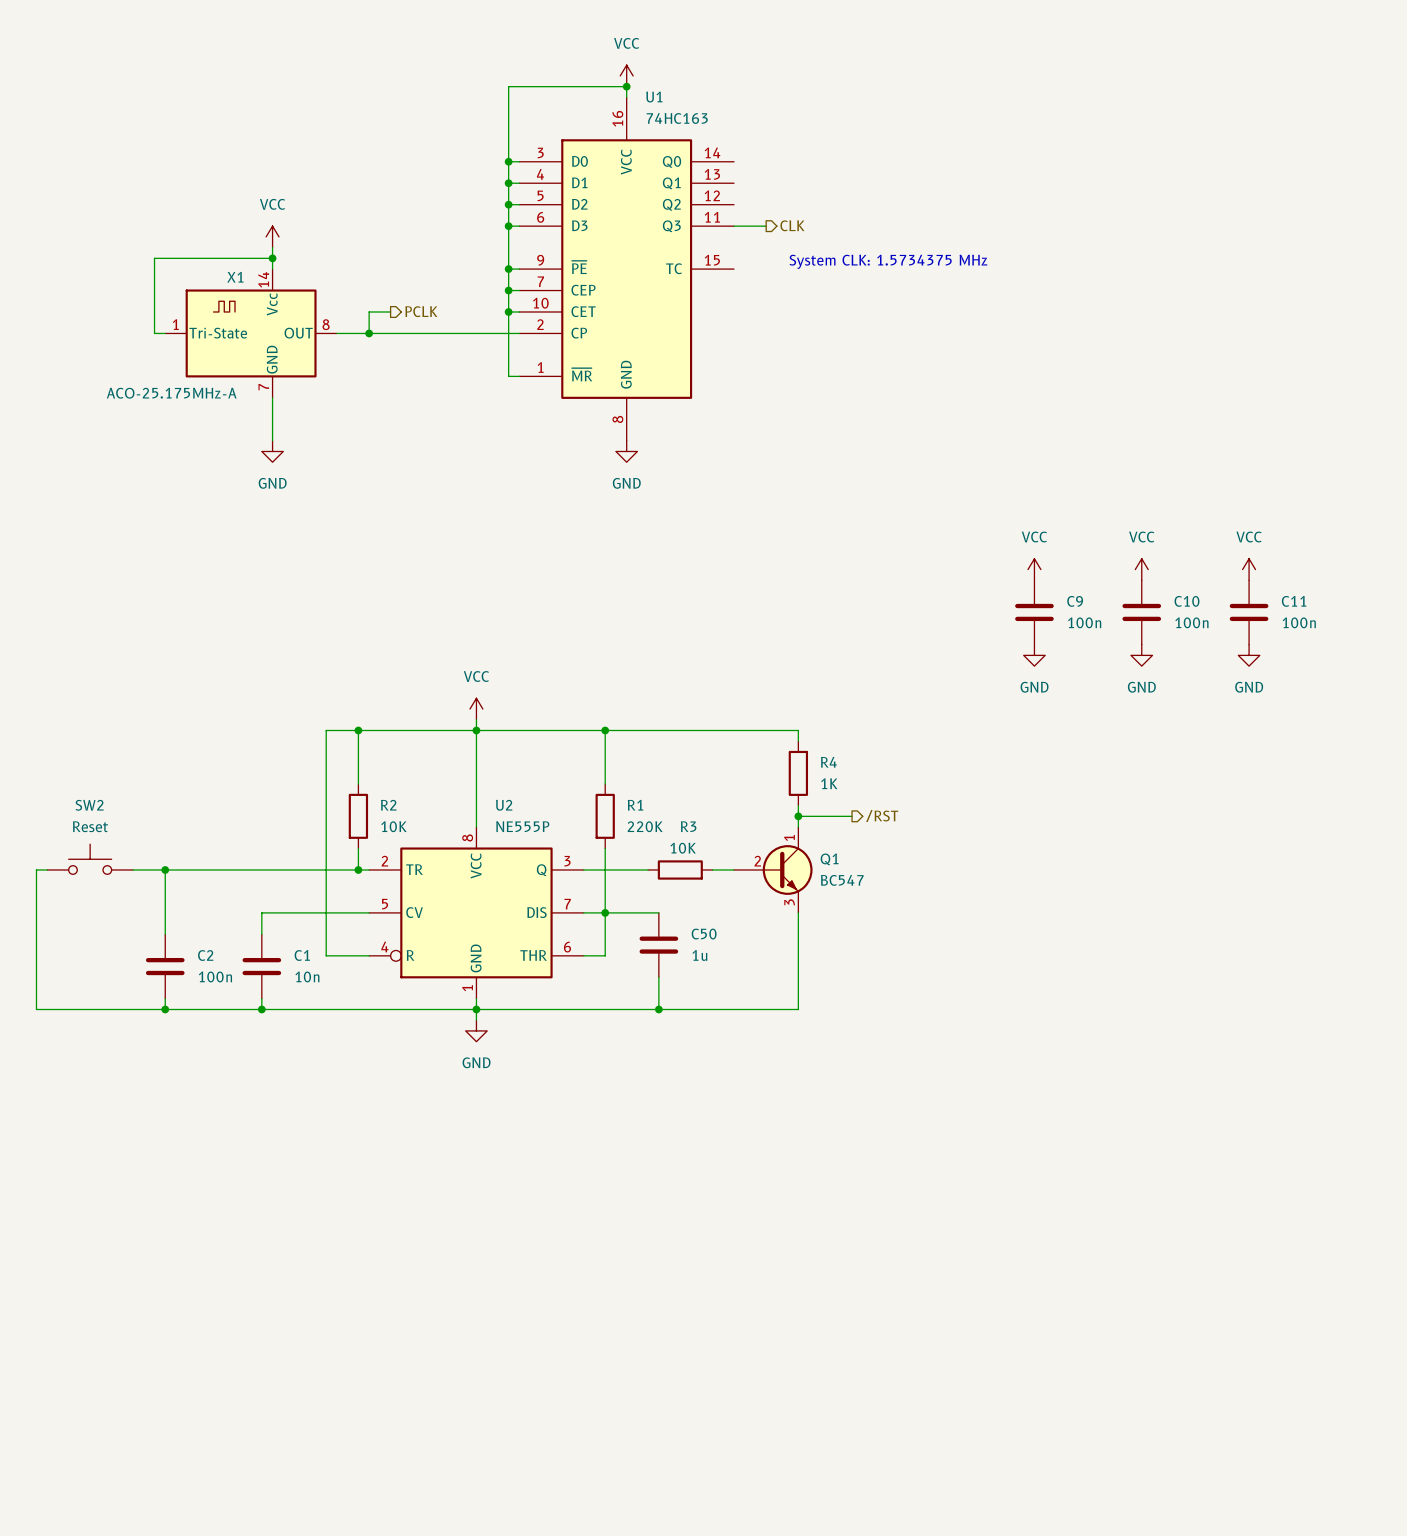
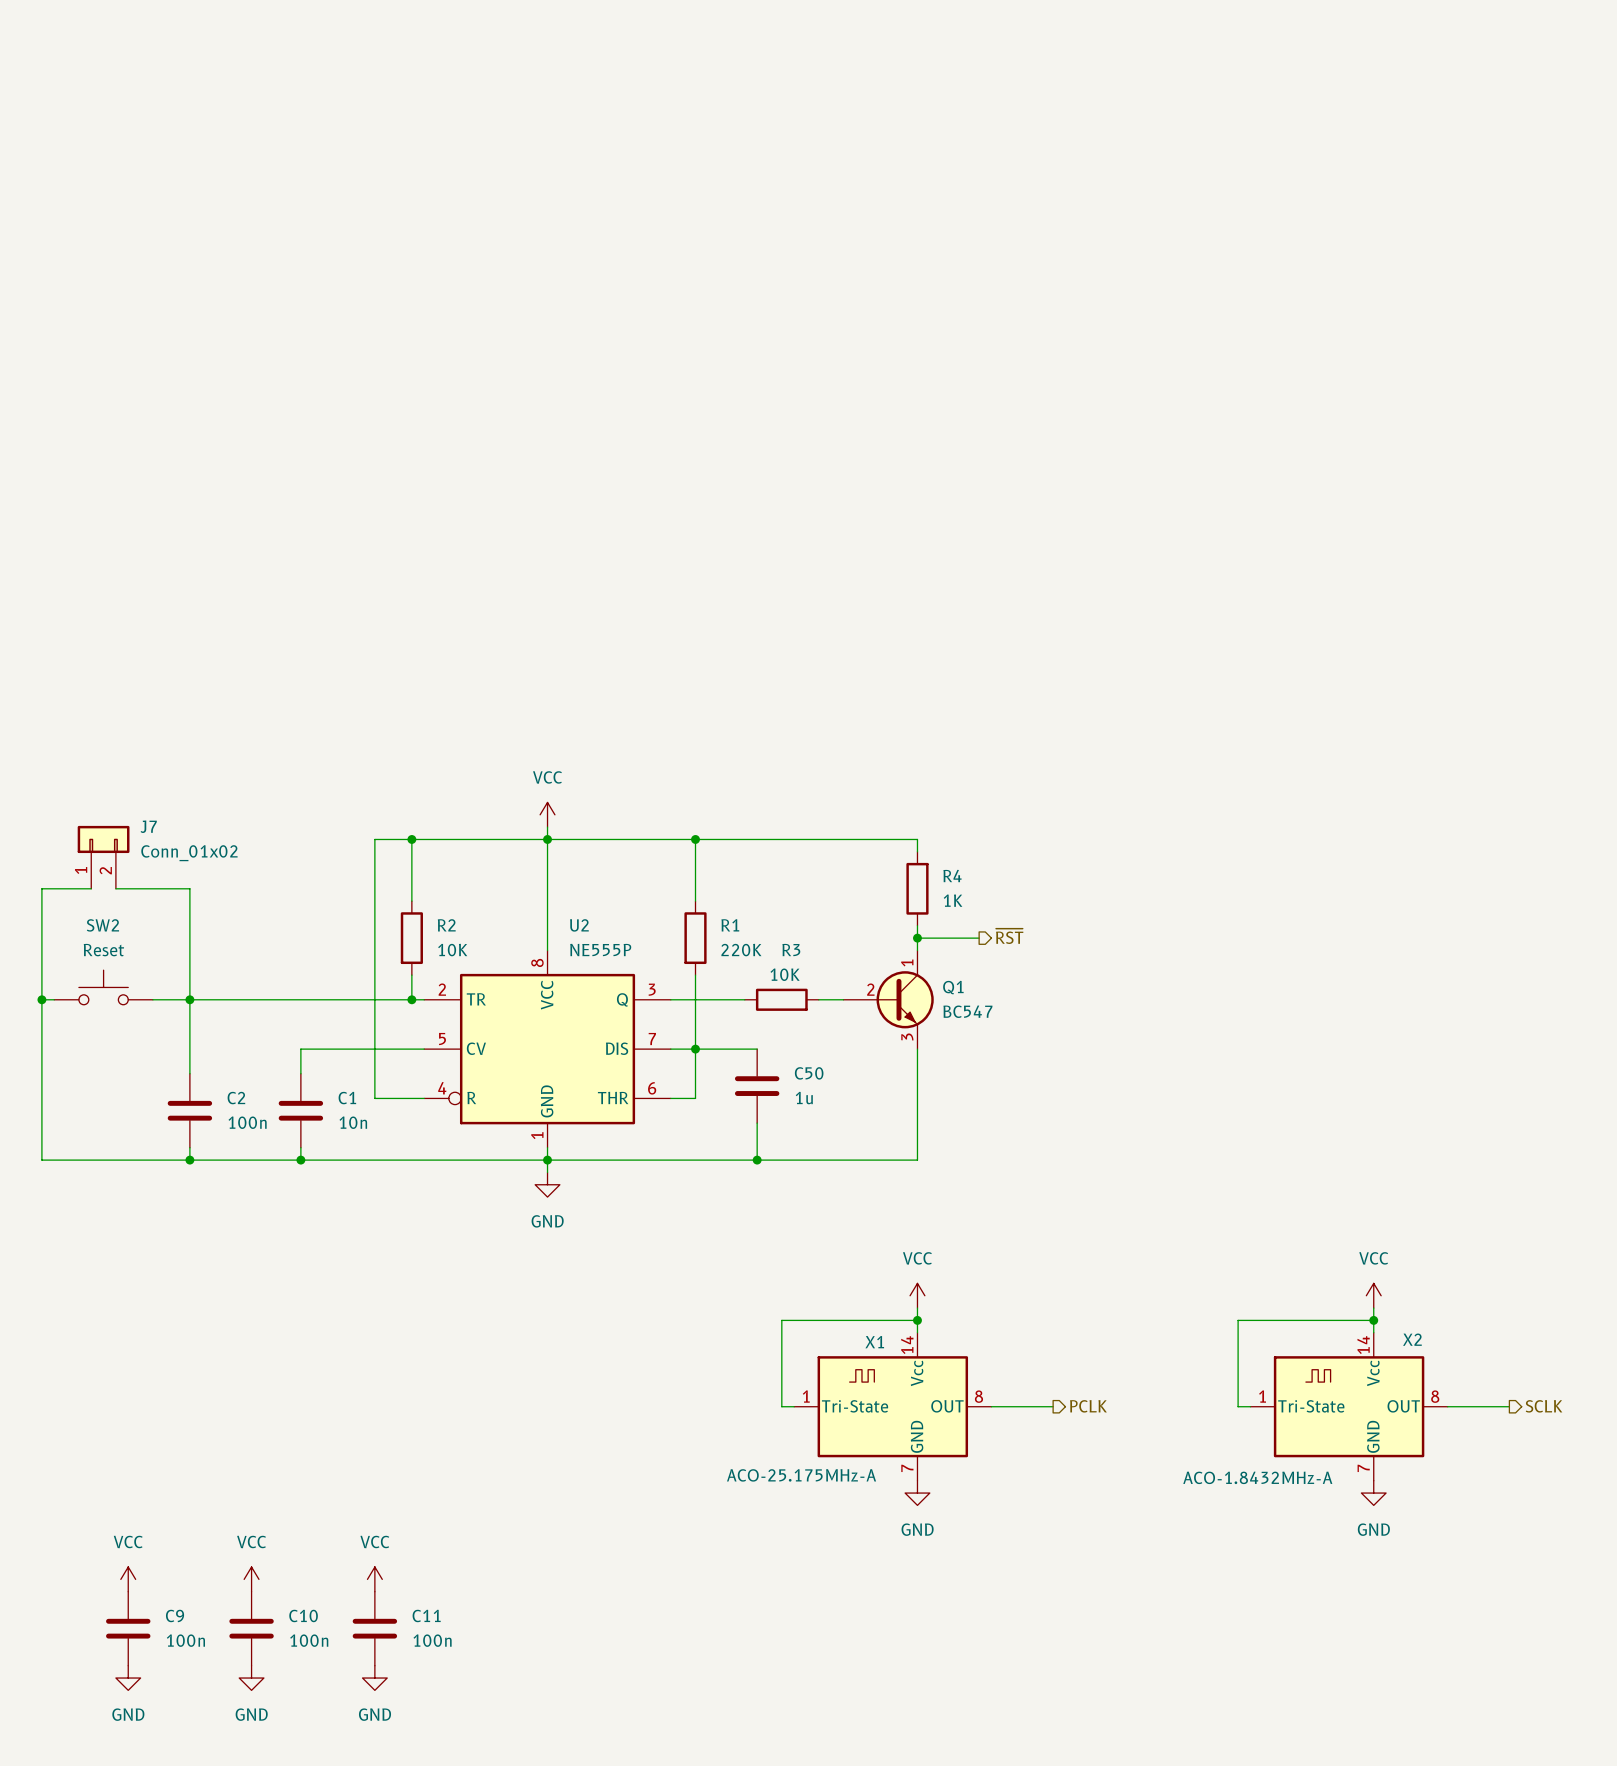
power symbol: VCC (626, 75) -> none
junction: (626, 86) -> none
wire: (626, 97) (626, 86) (508, 86) (508, 376) (519, 376) -> none
wire: (508, 161) (519, 161) -> none
junction: (508, 161) -> none
wire: (508, 183) (519, 183) -> none
junction: (508, 183) -> none
wire: (508, 204) (519, 204) -> none
junction: (508, 204) -> none
hierarchical label: CLK (792, 225) -> none
wire: (508, 226) (519, 226) -> none
junction: (508, 226) -> none
wire: (733, 226) (766, 226) -> none
power symbol: VCC (272, 236) -> none
wire: (272, 247) (272, 269) -> none
wire: (272, 258) (154, 258) (154, 333) (165, 333) -> none
junction: (272, 258) -> none
text: System CLK: 1.5734375 MHz (888, 261) -> none
wire: (508, 269) (519, 269) -> none
junction: (508, 269) -> none
U1: 74HC163 (626, 269) -> none
wire: (508, 290) (519, 290) -> none
junction: (508, 290) -> none
wire: (390, 311) (369, 311) (369, 333) -> none
hierarchical label: PCLK (421, 311) -> none
wire: (508, 311) (519, 311) -> none
junction: (508, 311) -> none
X1 position: (251, 333) -> (892, 1406)
wire: (336, 333) (519, 333) -> none
junction: (369, 333) -> none
wire: (272, 397) (272, 440) -> none
power symbol: GND (272, 451) -> none
power symbol: GND (626, 451) -> none
power symbol: VCC (1034, 569) -> none
power symbol: VCC (1141, 569) -> none
power symbol: VCC (1249, 569) -> none
C9 position: (1034, 612) -> (128, 1628)
C10 position: (1141, 612) -> (251, 1628)
C11 position: (1249, 612) -> (374, 1628)
power symbol: GND (1034, 655) -> none
power symbol: GND (1141, 655) -> none
power symbol: GND (1249, 655) -> none
J7: none -> Conn_01x02 (103, 857)
wire: none -> (91, 888) (41, 888) (41, 999)
wire: none -> (115, 888) (189, 888) (189, 999)
hierarchical label: /RST (882, 816) -> ~{RST} (1009, 936)
junction: none -> (41, 999)
power symbol: none -> VCC (917, 1295)
power symbol: none -> VCC (1373, 1295)
wire: none -> (917, 1308) (917, 1332)
wire: none -> (1373, 1308) (1373, 1332)
wire: none -> (917, 1320) (781, 1320) (781, 1406) (794, 1406)
junction: none -> (917, 1320)
wire: none -> (1373, 1320) (1238, 1320) (1238, 1406) (1250, 1406)
junction: none -> (1373, 1320)
hierarchical label: none -> PCLK (1088, 1406)
hierarchical label: none -> SCLK (1544, 1406)
wire: none -> (991, 1406) (1053, 1406)
X2: none -> ACO-1.8432MHz-A (1349, 1406)
wire: none -> (1447, 1406) (1509, 1406)
power symbol: none -> GND (917, 1493)
power symbol: none -> GND (1373, 1493)
power symbol: none -> VCC (128, 1579)
power symbol: none -> VCC (251, 1579)
power symbol: none -> VCC (374, 1579)
power symbol: none -> GND (128, 1678)
power symbol: none -> GND (251, 1678)
power symbol: none -> GND (374, 1678)

